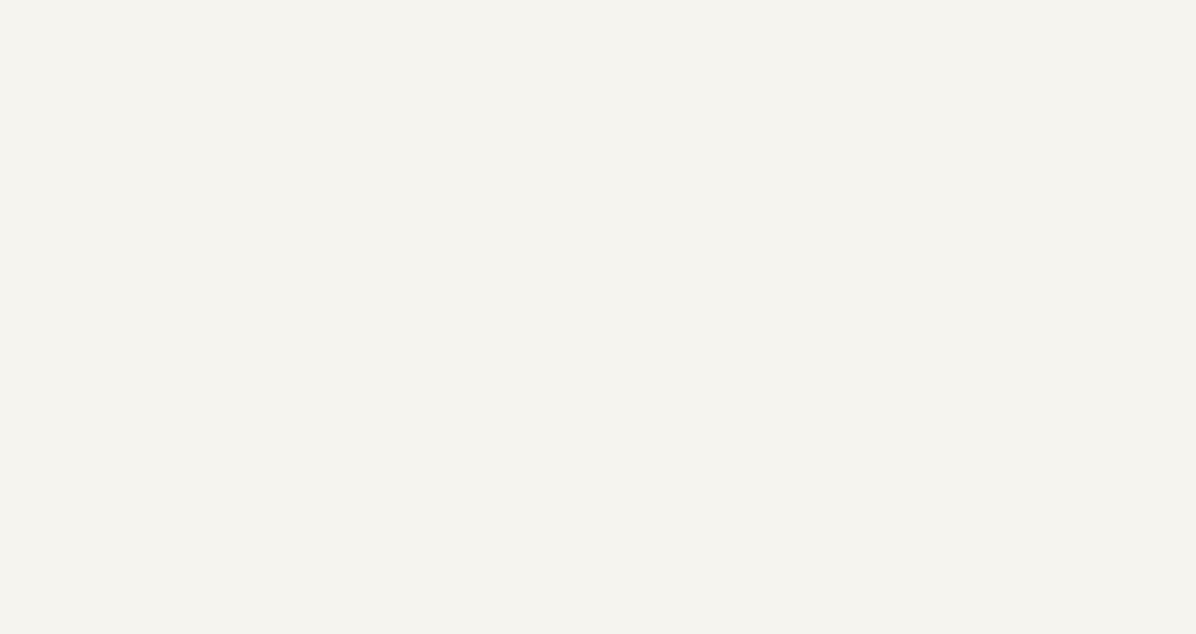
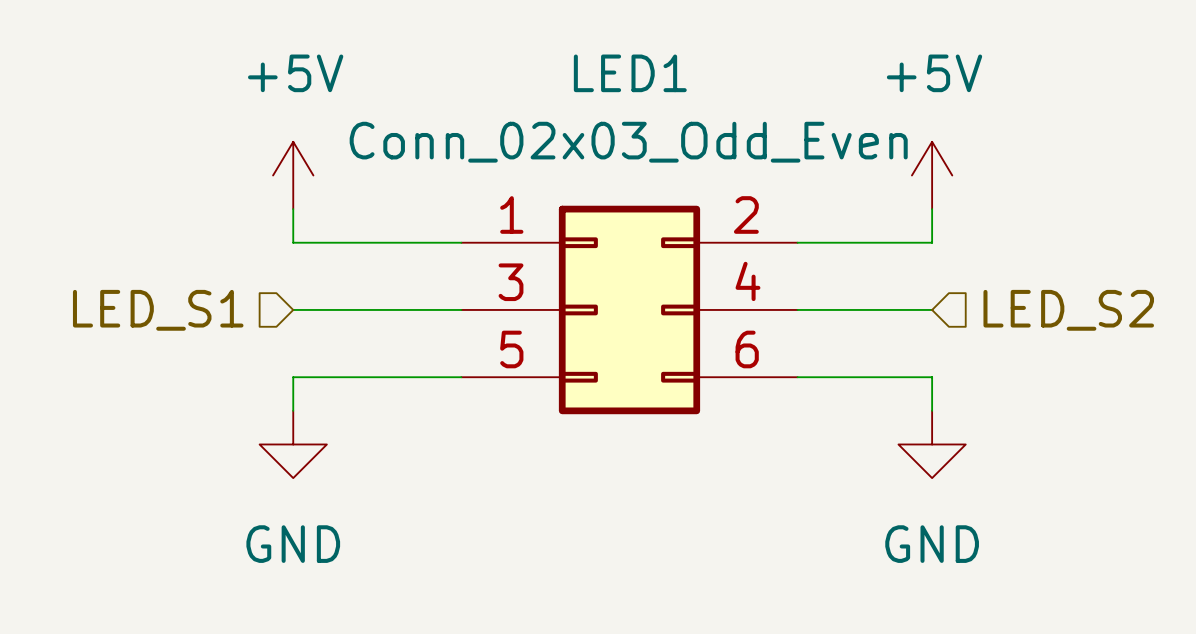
power symbol: none -> +5V (293, 175)
power symbol: none -> +5V (932, 175)
wire: none -> (293, 209) (293, 242) (461, 242)
wire: none -> (932, 209) (932, 242) (797, 242)
wire: none -> (293, 309) (461, 309)
LED1: none -> Conn_02x03_Odd_Even (629, 309)
wire: none -> (797, 309) (932, 309)
hierarchical label: none -> LED_S1 (158, 310)
hierarchical label: none -> LED_S2 (1068, 310)
wire: none -> (461, 377) (293, 377) (293, 410)
wire: none -> (797, 377) (932, 377) (932, 410)
power symbol: none -> GND (293, 444)
power symbol: none -> GND (932, 444)

